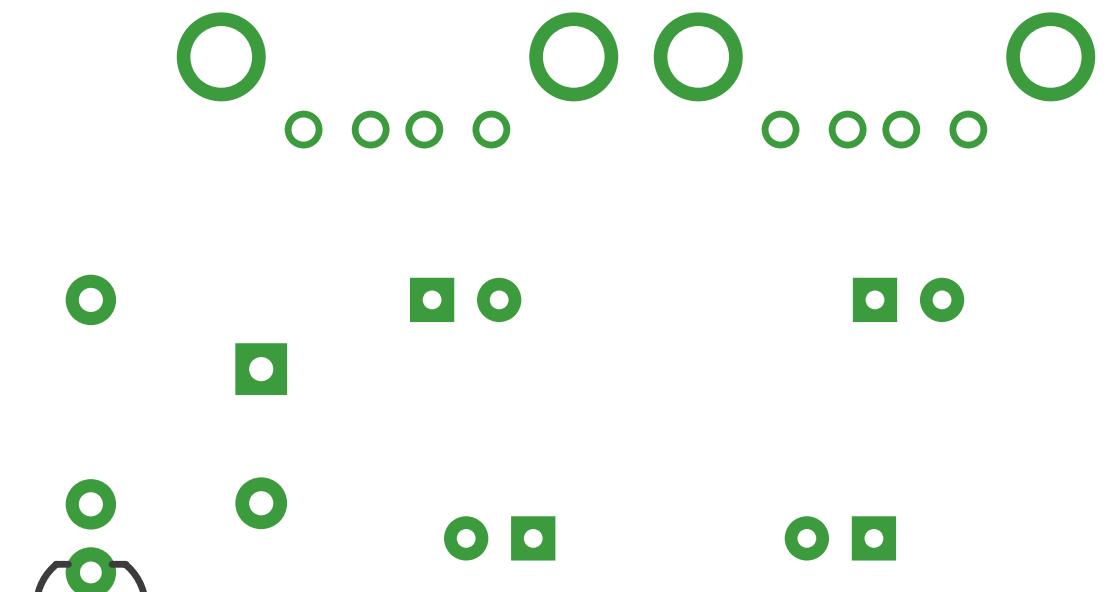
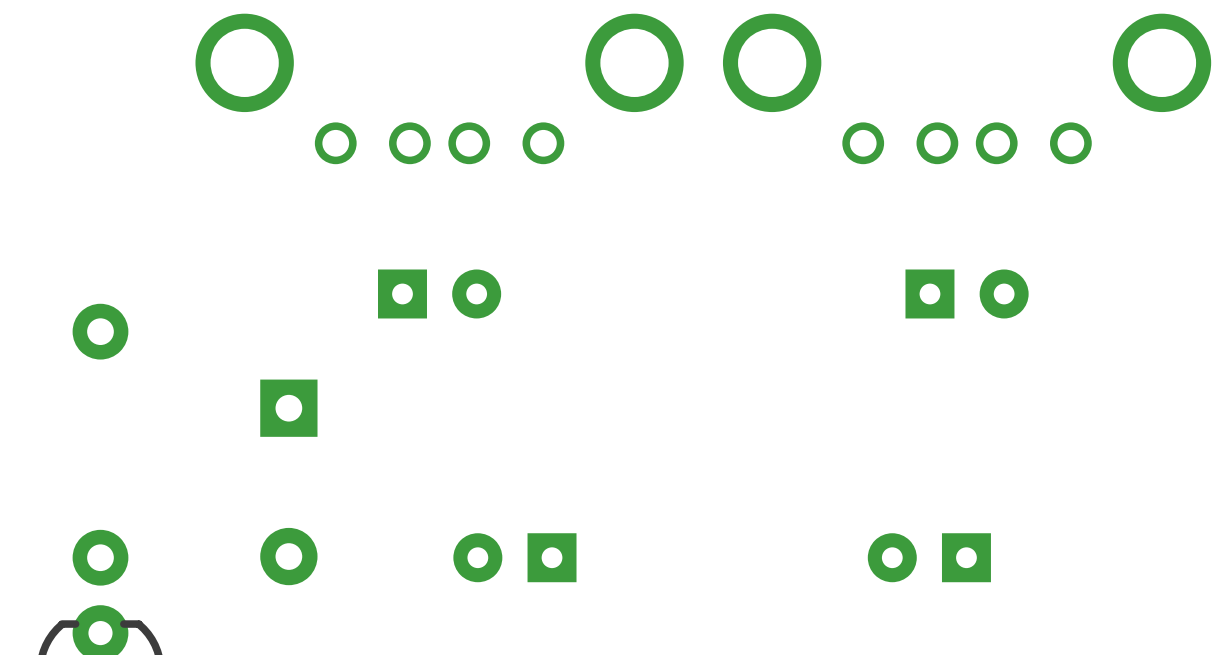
part position: (465, 299) -> (439, 293)
part position: (908, 299) -> (967, 293)
part position: (499, 538) -> (514, 557)
part position: (840, 538) -> (929, 557)

